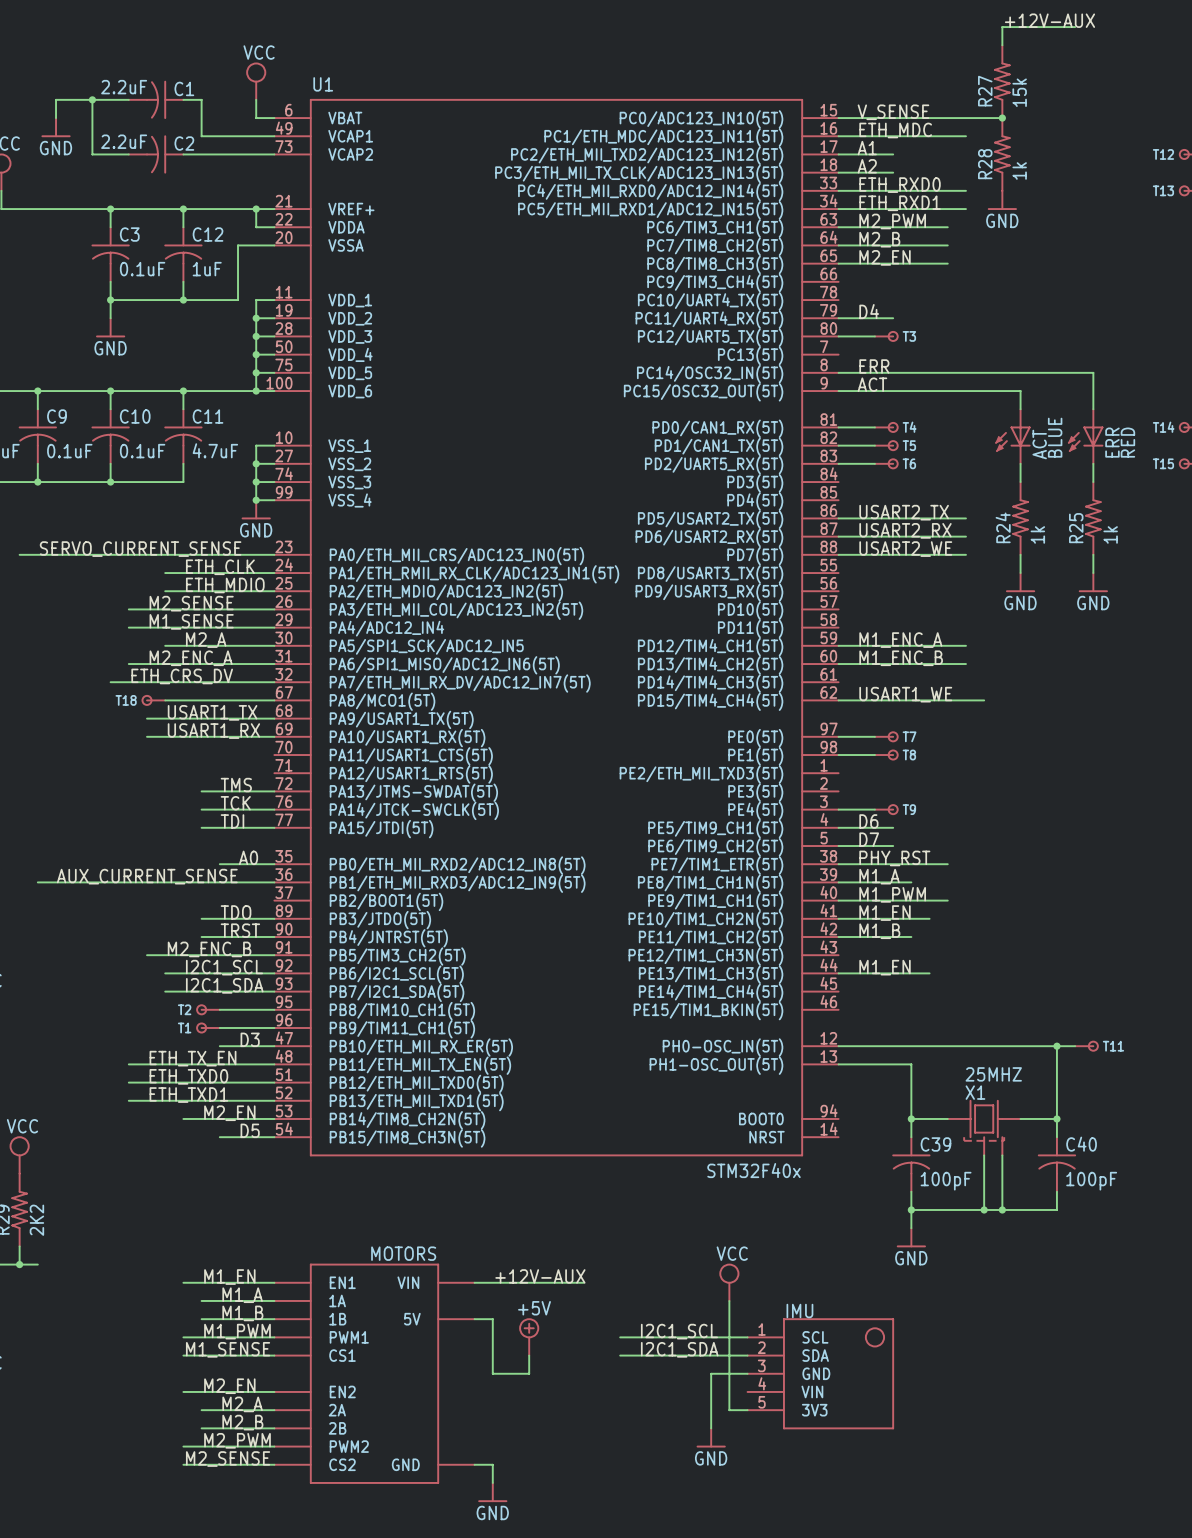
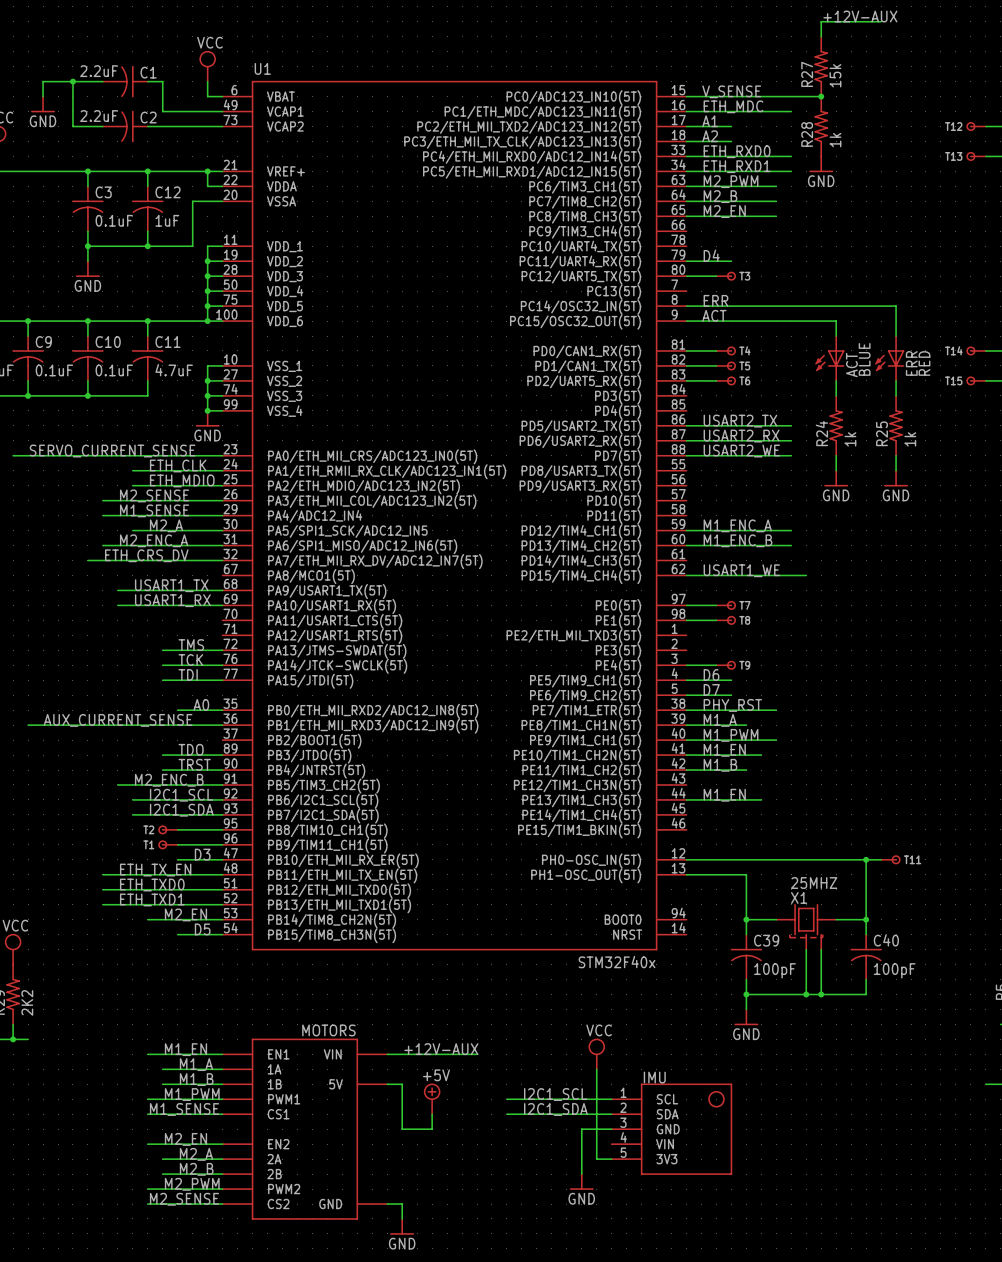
T18: (153, 700) -> none
wire: (165, 700) (274, 700) -> none

